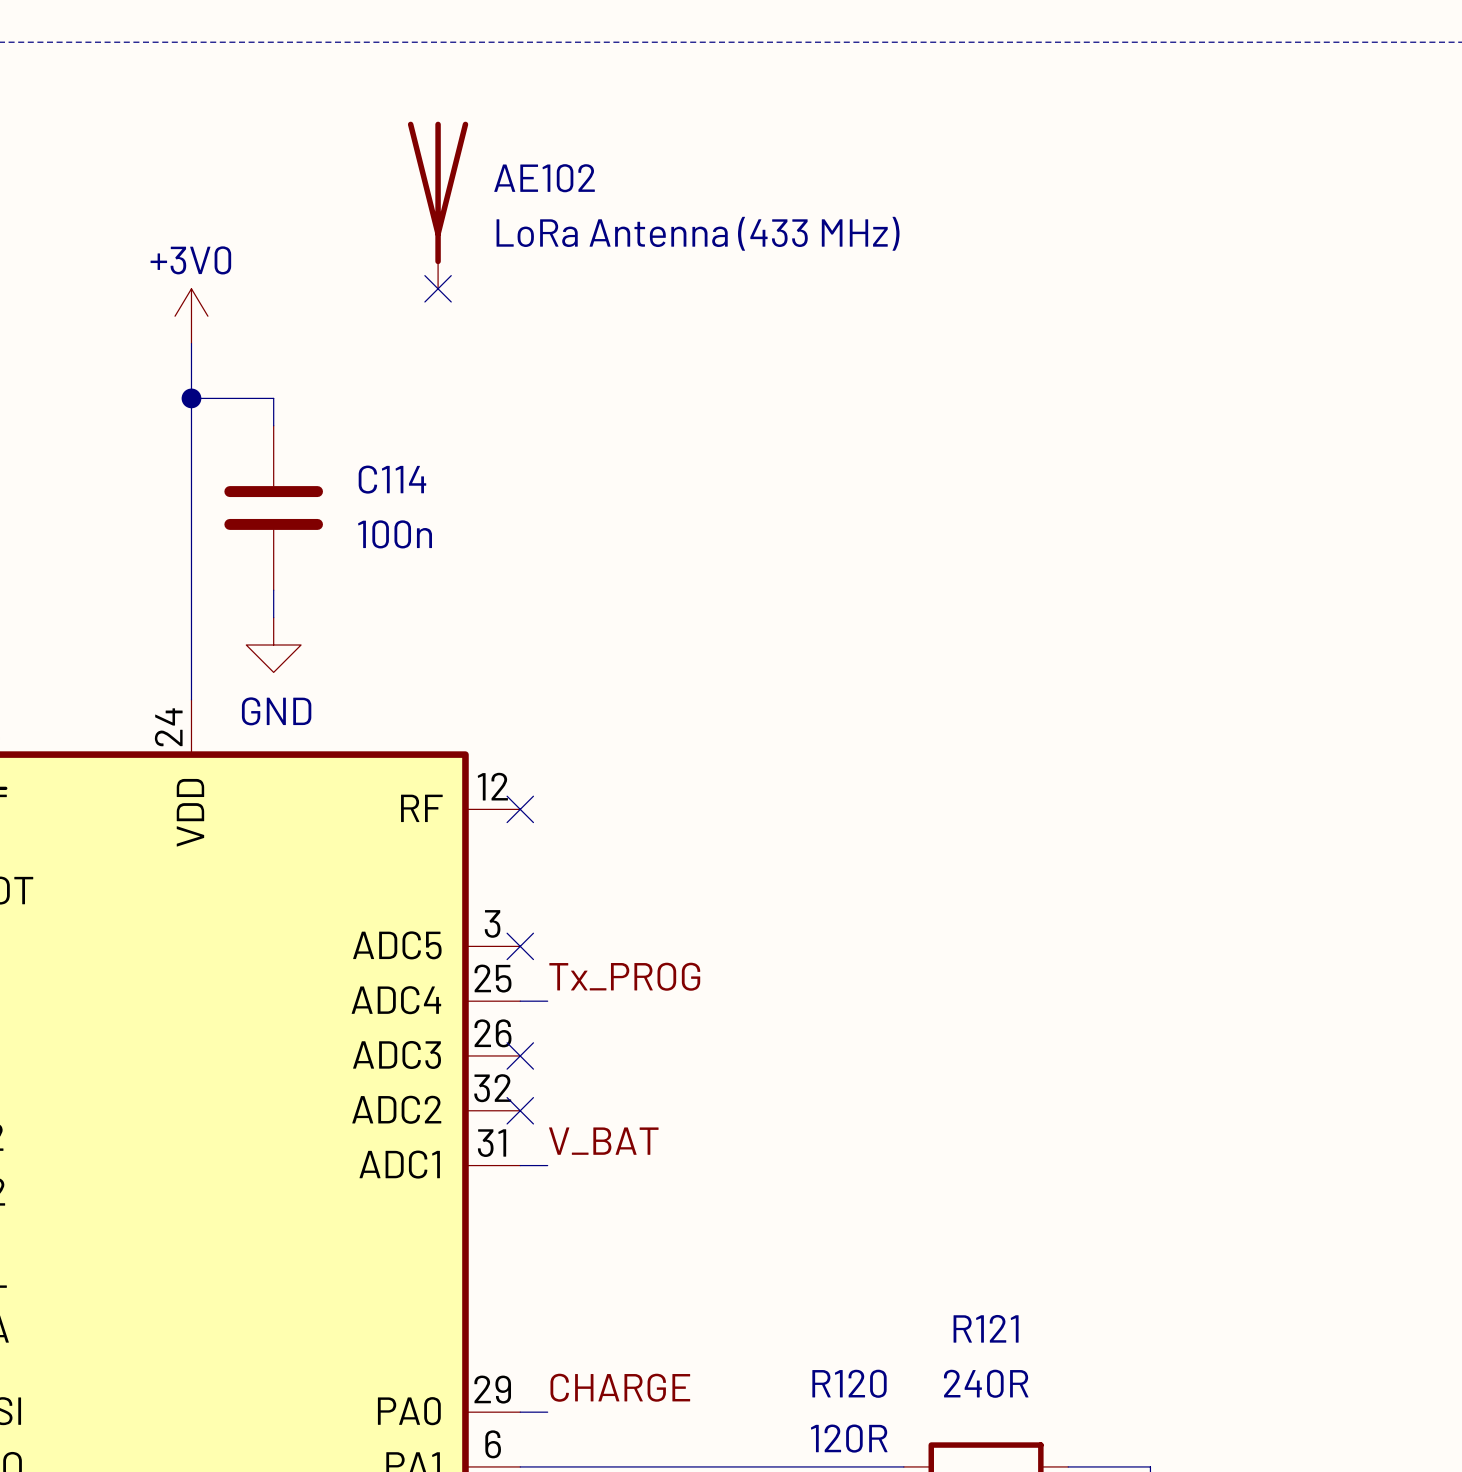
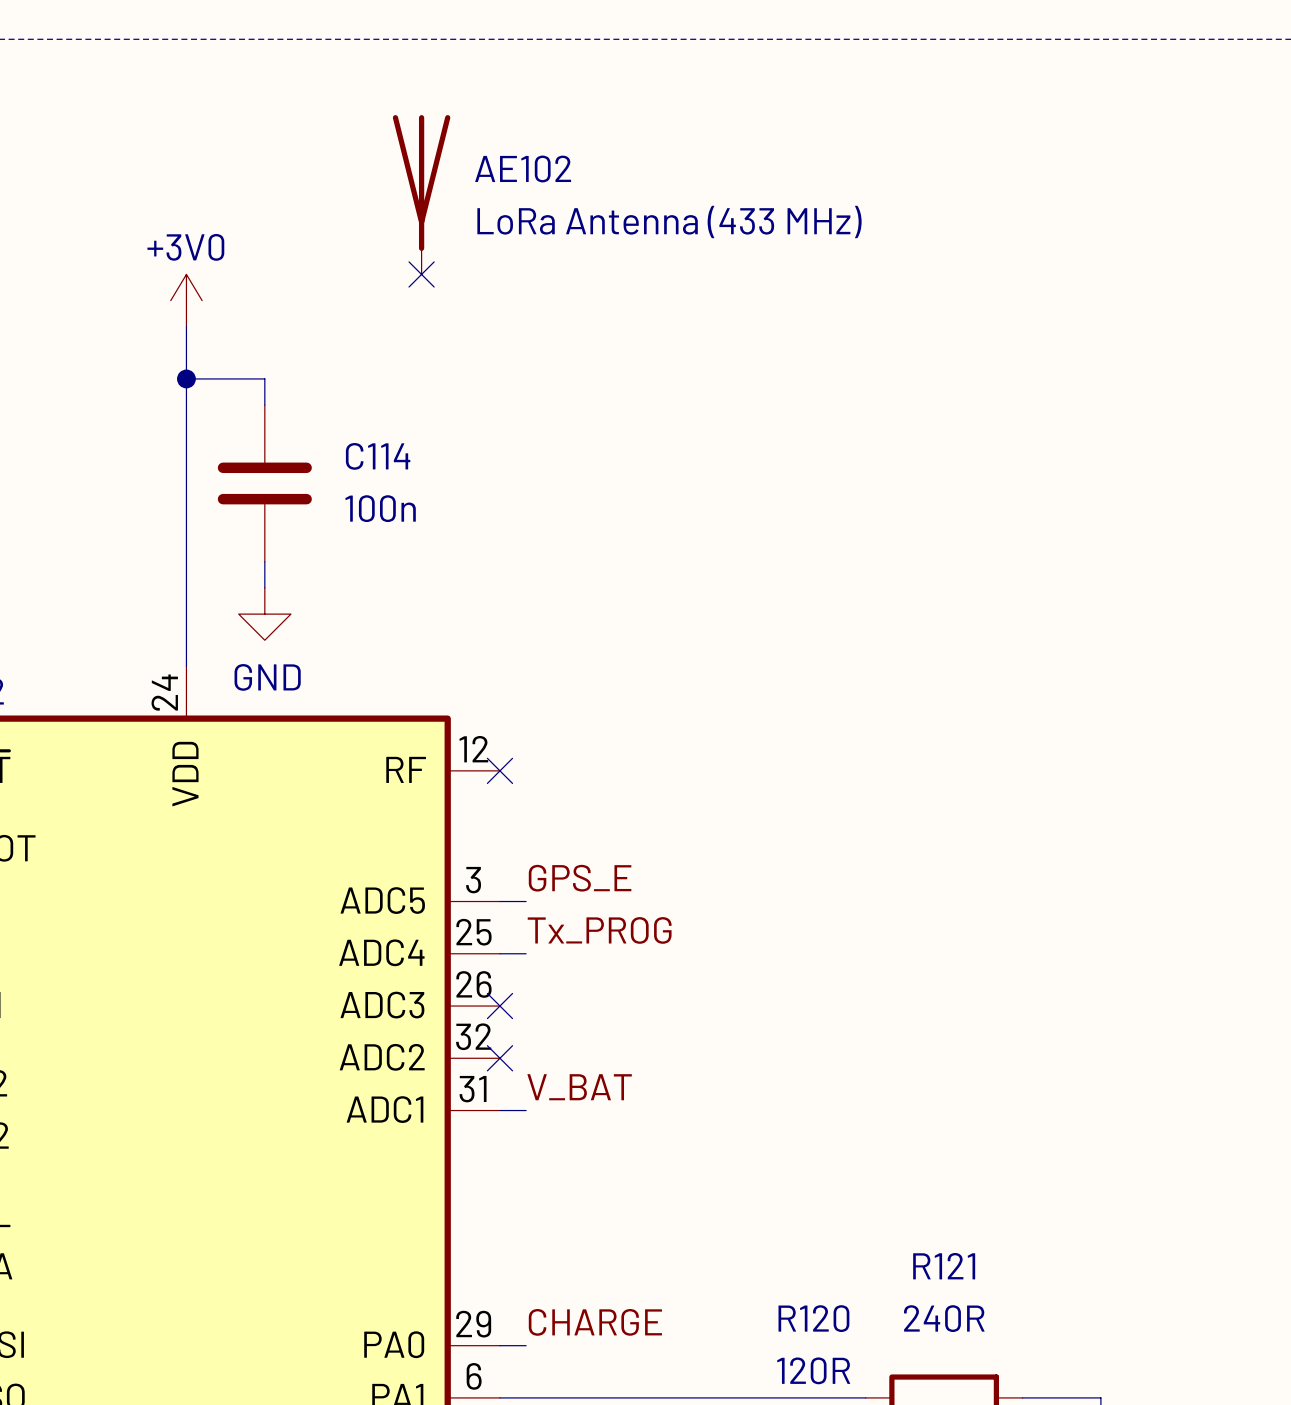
label: none -> GPS_E (580, 878)
wire: none -> (499, 901) (526, 901)
no-connect mark: (520, 946) -> none

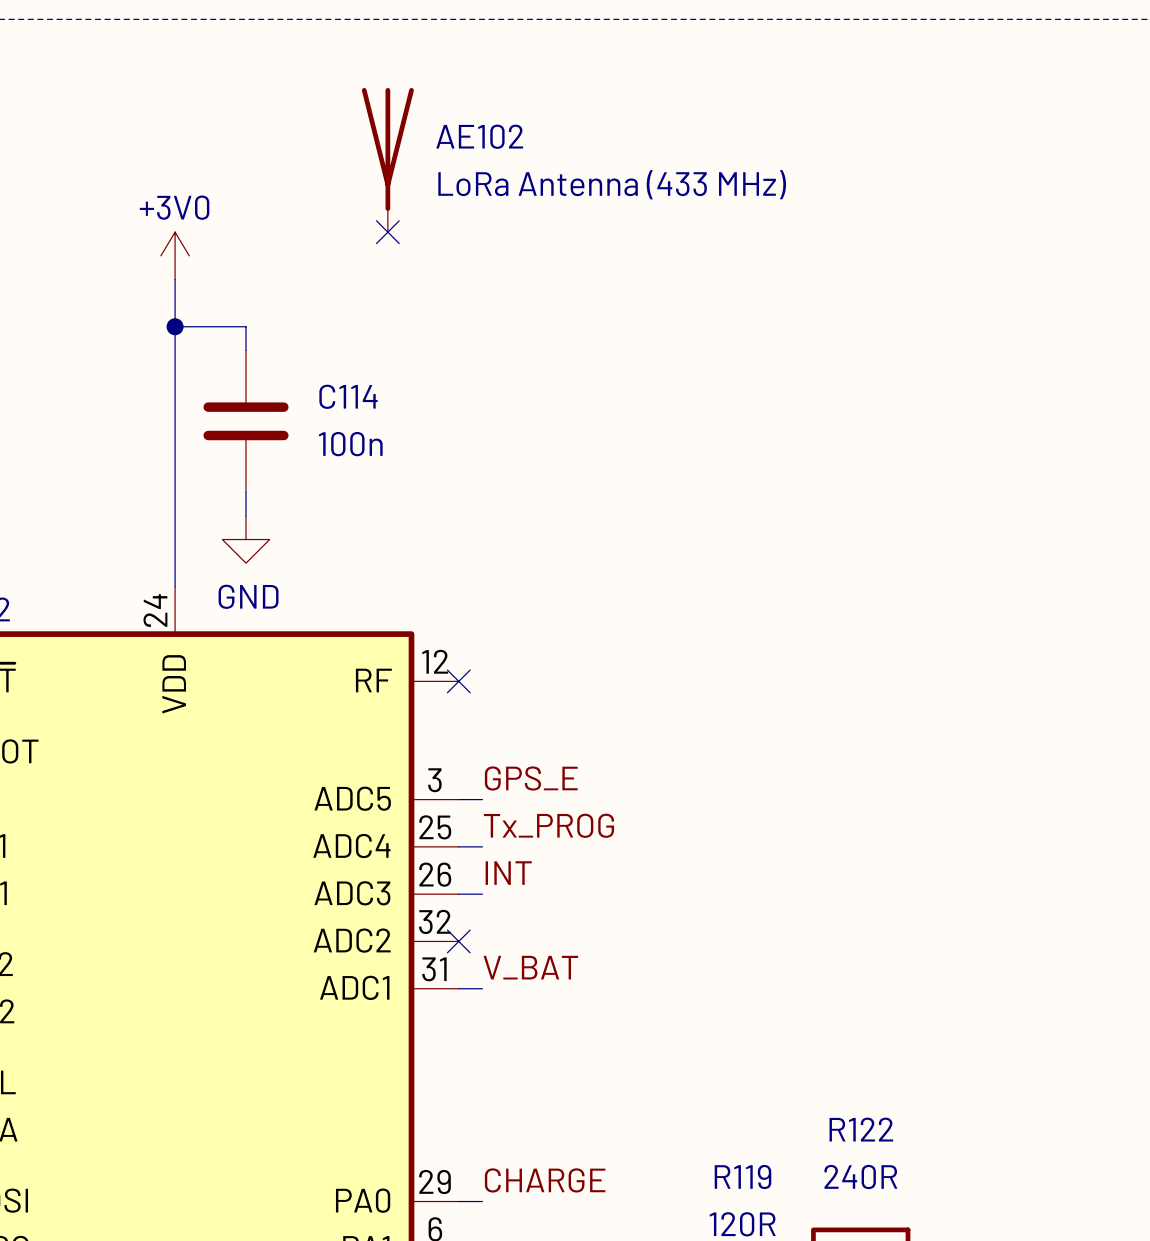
label: none -> INT (508, 873)
wire: none -> (458, 894) (482, 894)
no-connect mark: (499, 1006) -> none
R121 name: R121 (944, 1266) -> R122 (861, 1129)
R120 name: R120 (813, 1318) -> R119 (742, 1177)

